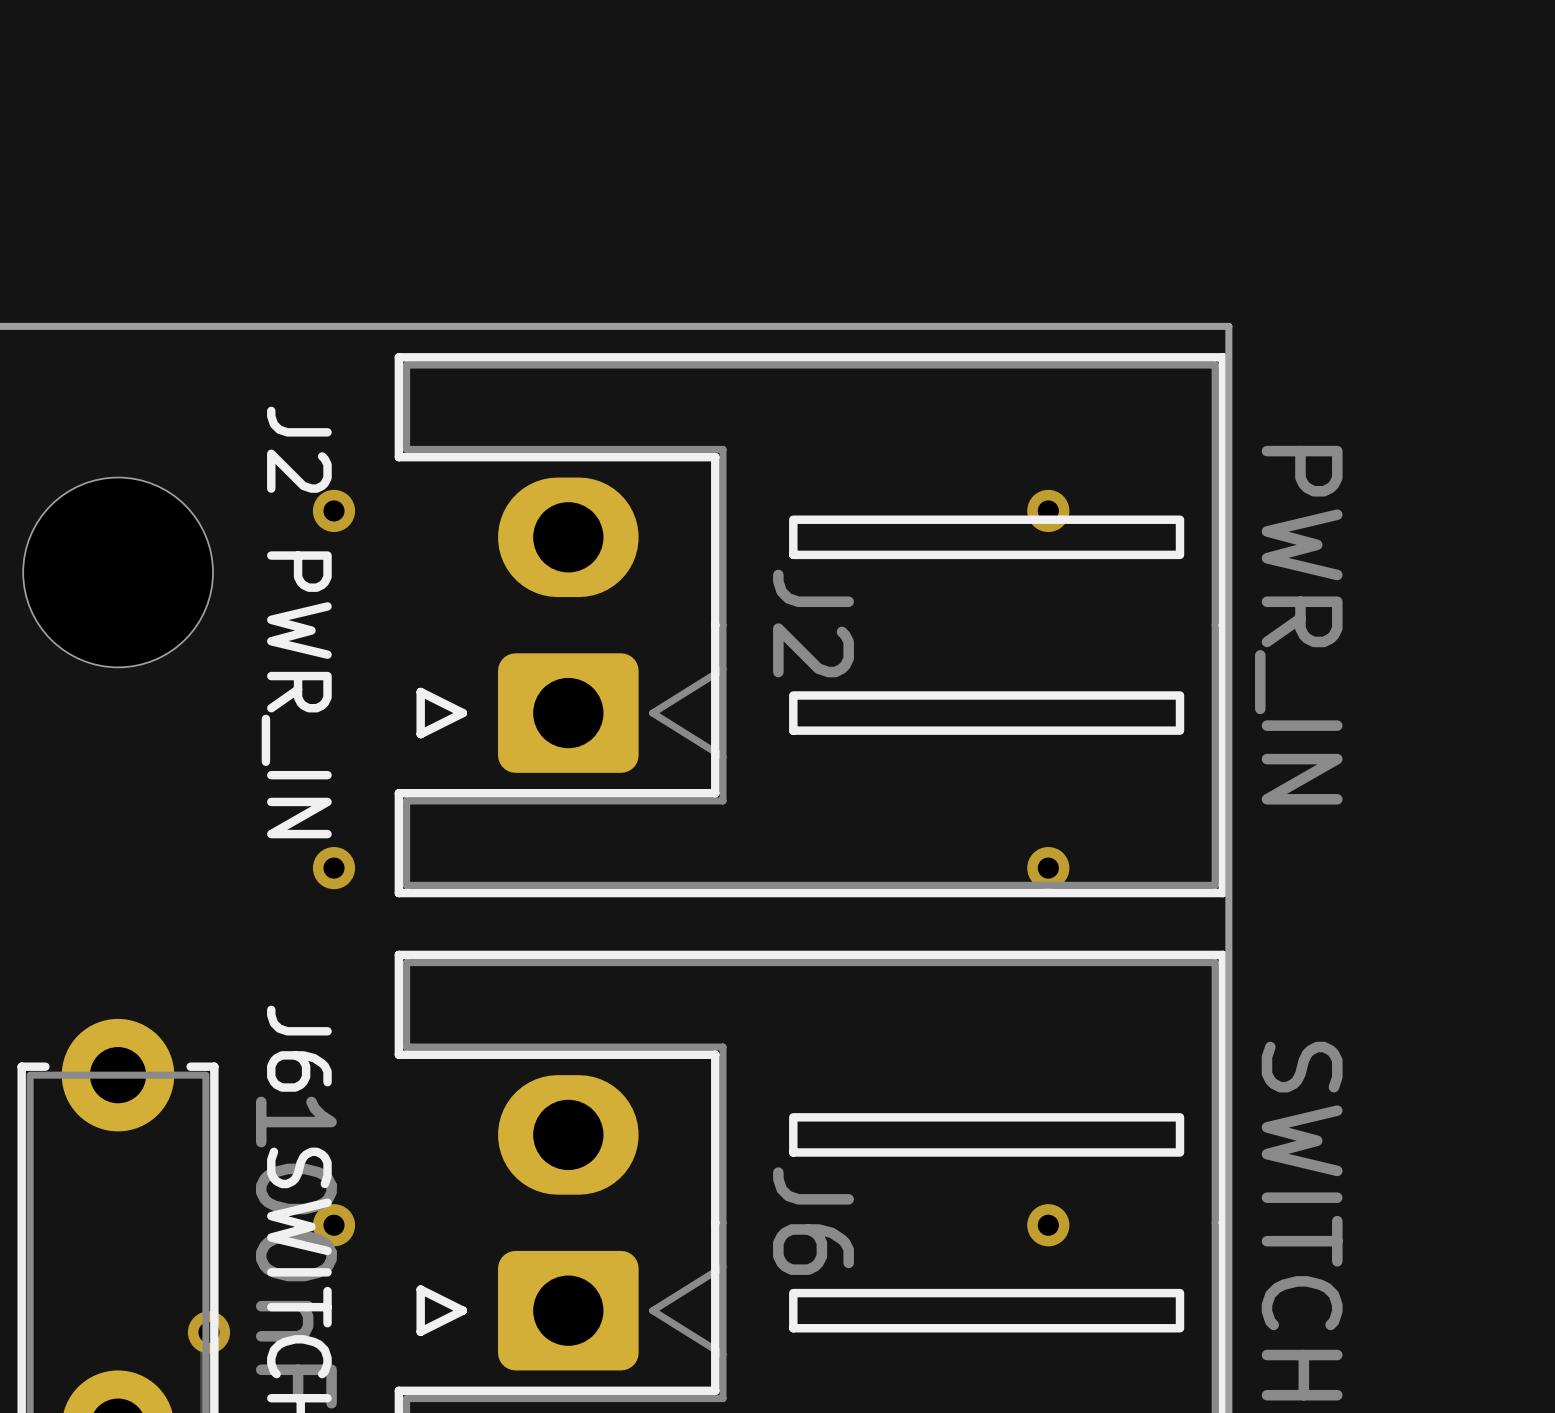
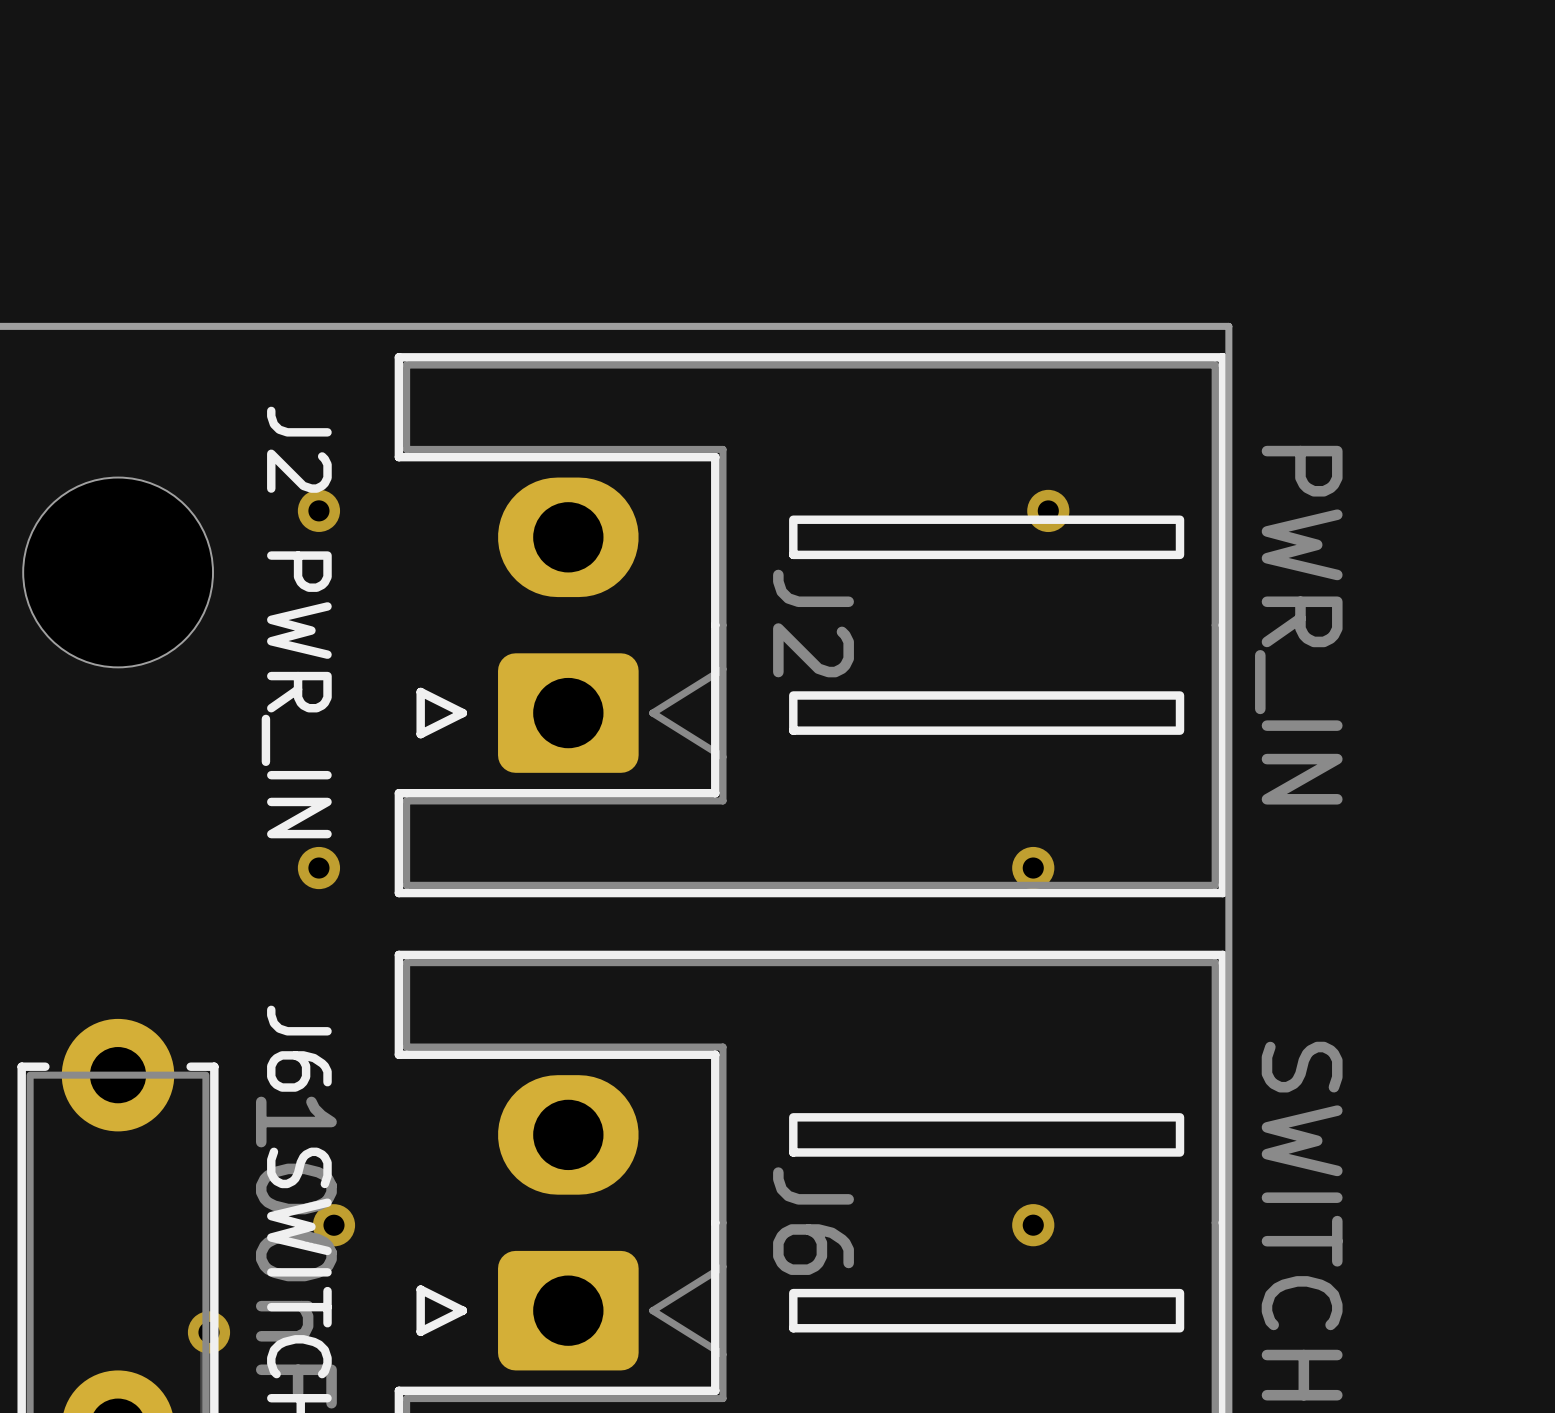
via position: (333, 510) -> (318, 510)
via position: (333, 868) -> (318, 868)
via position: (1048, 868) -> (1033, 868)
via position: (1048, 1225) -> (1033, 1225)

